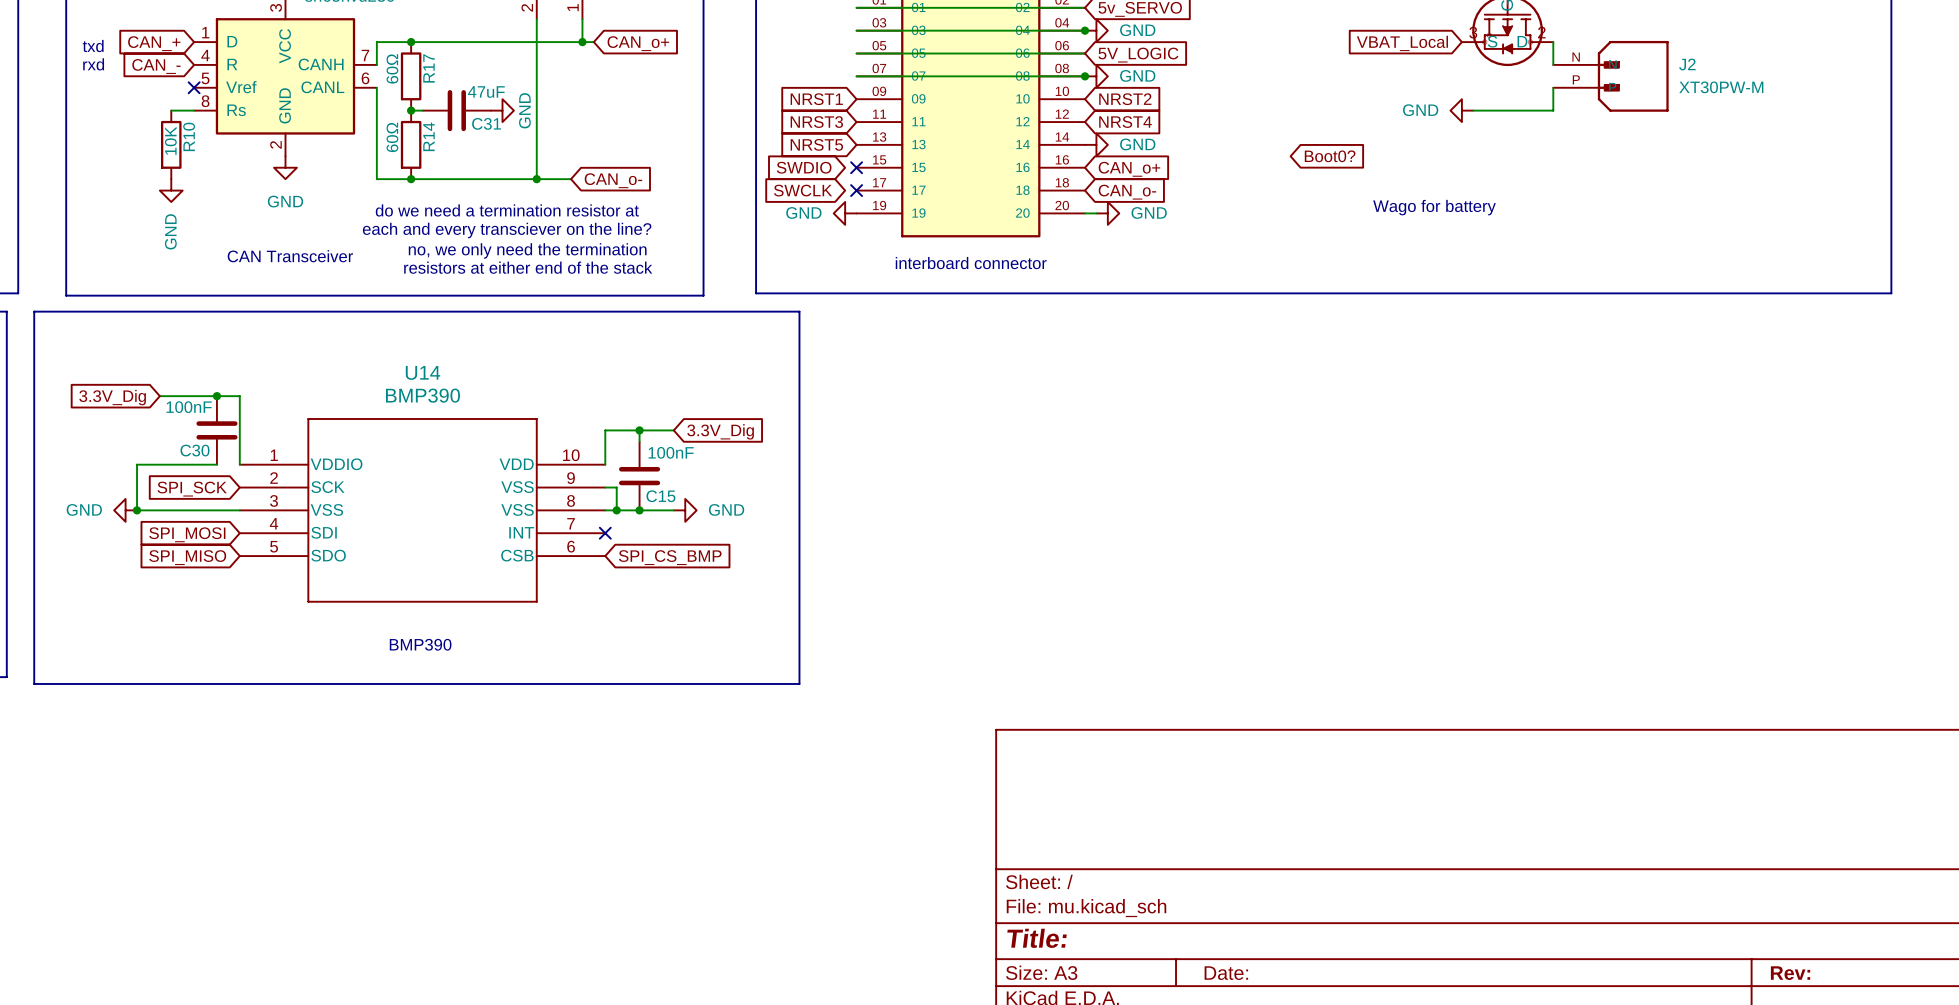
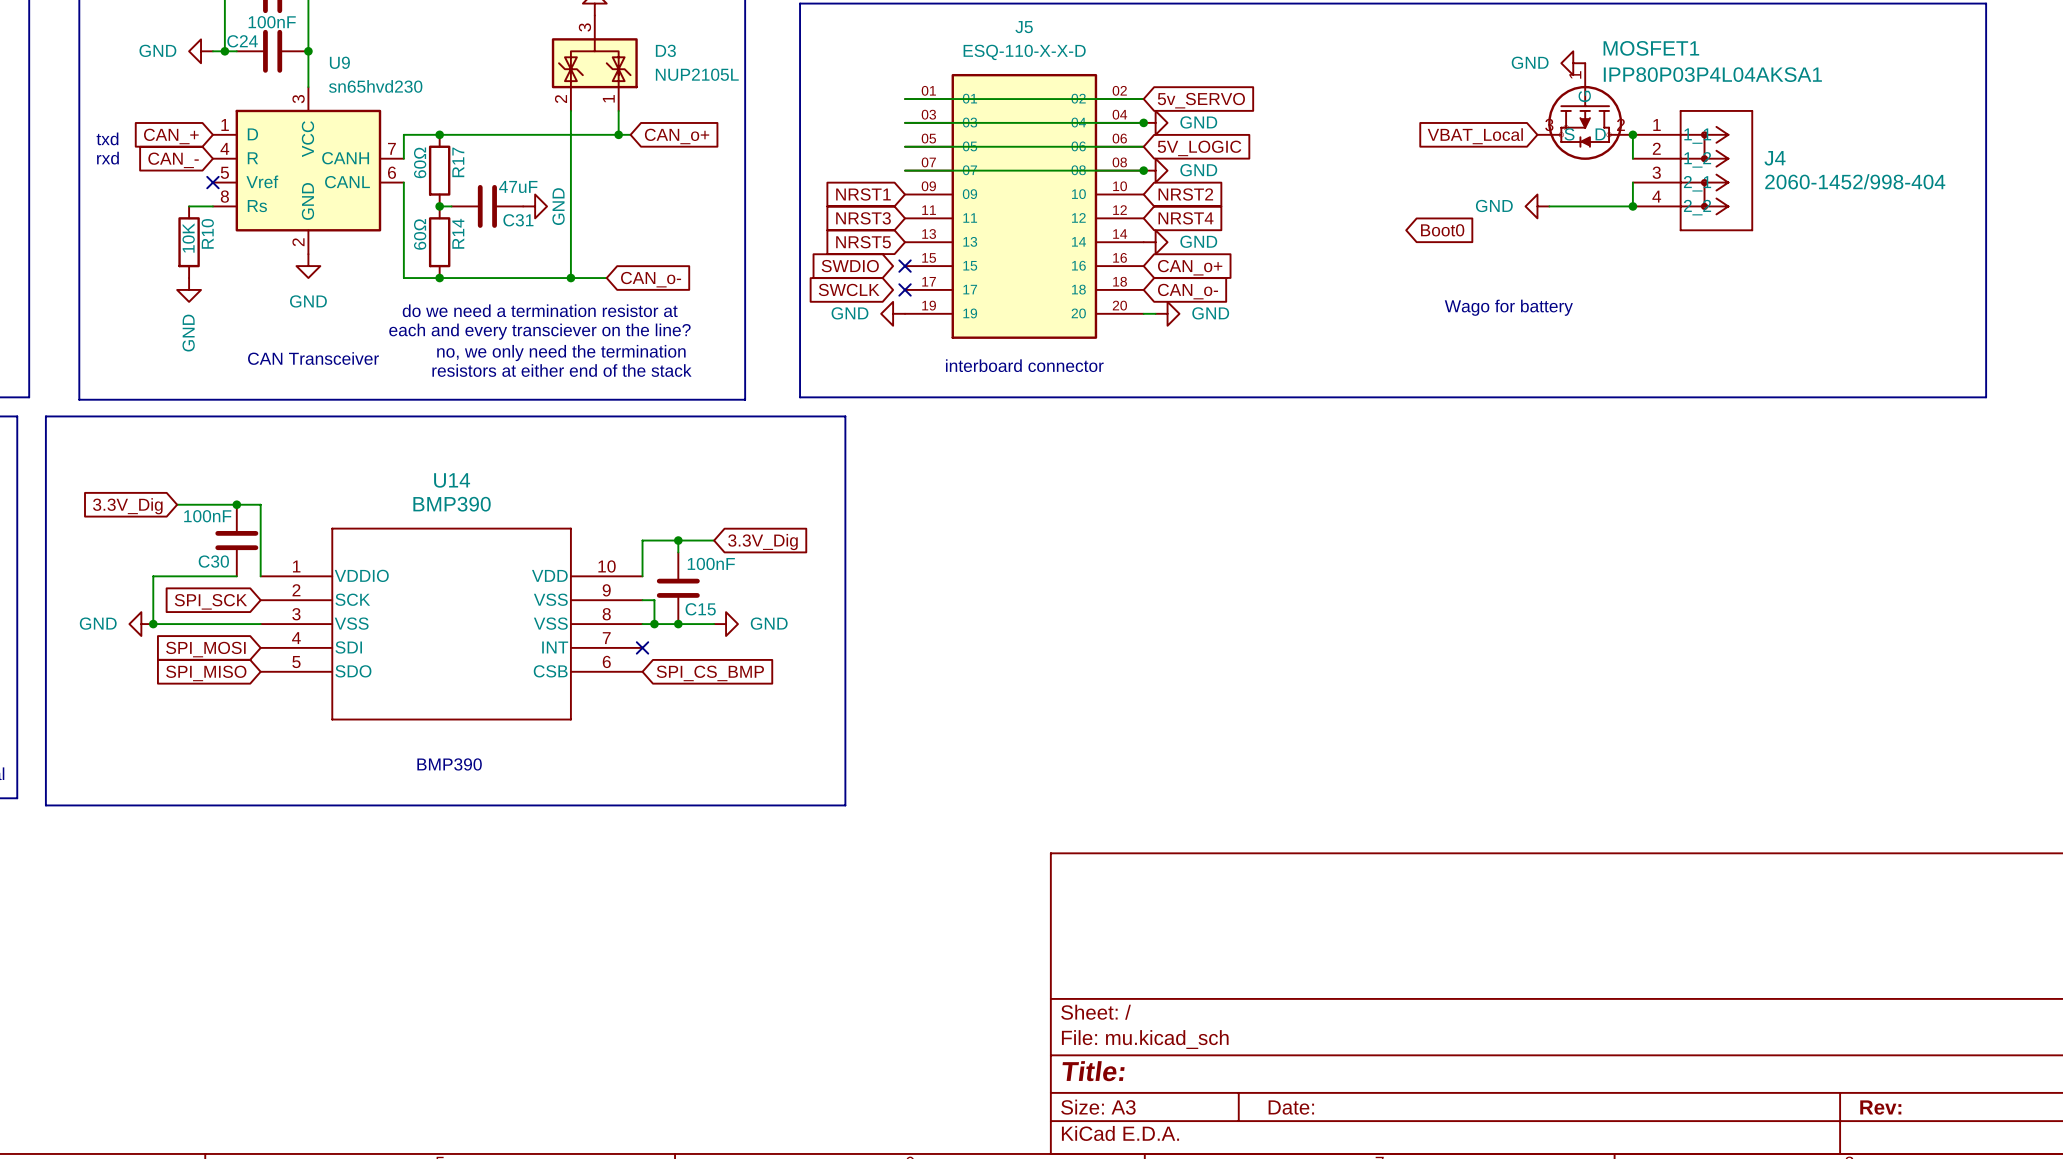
junction: none -> (1632, 134)
J2: XT30PW-M (1610, 76) -> none
J4: none -> 2060-1452/998-404 (1692, 170)
junction: none -> (1632, 206)
global label: Boot0? (1330, 156) -> Boot0 (1442, 230)

